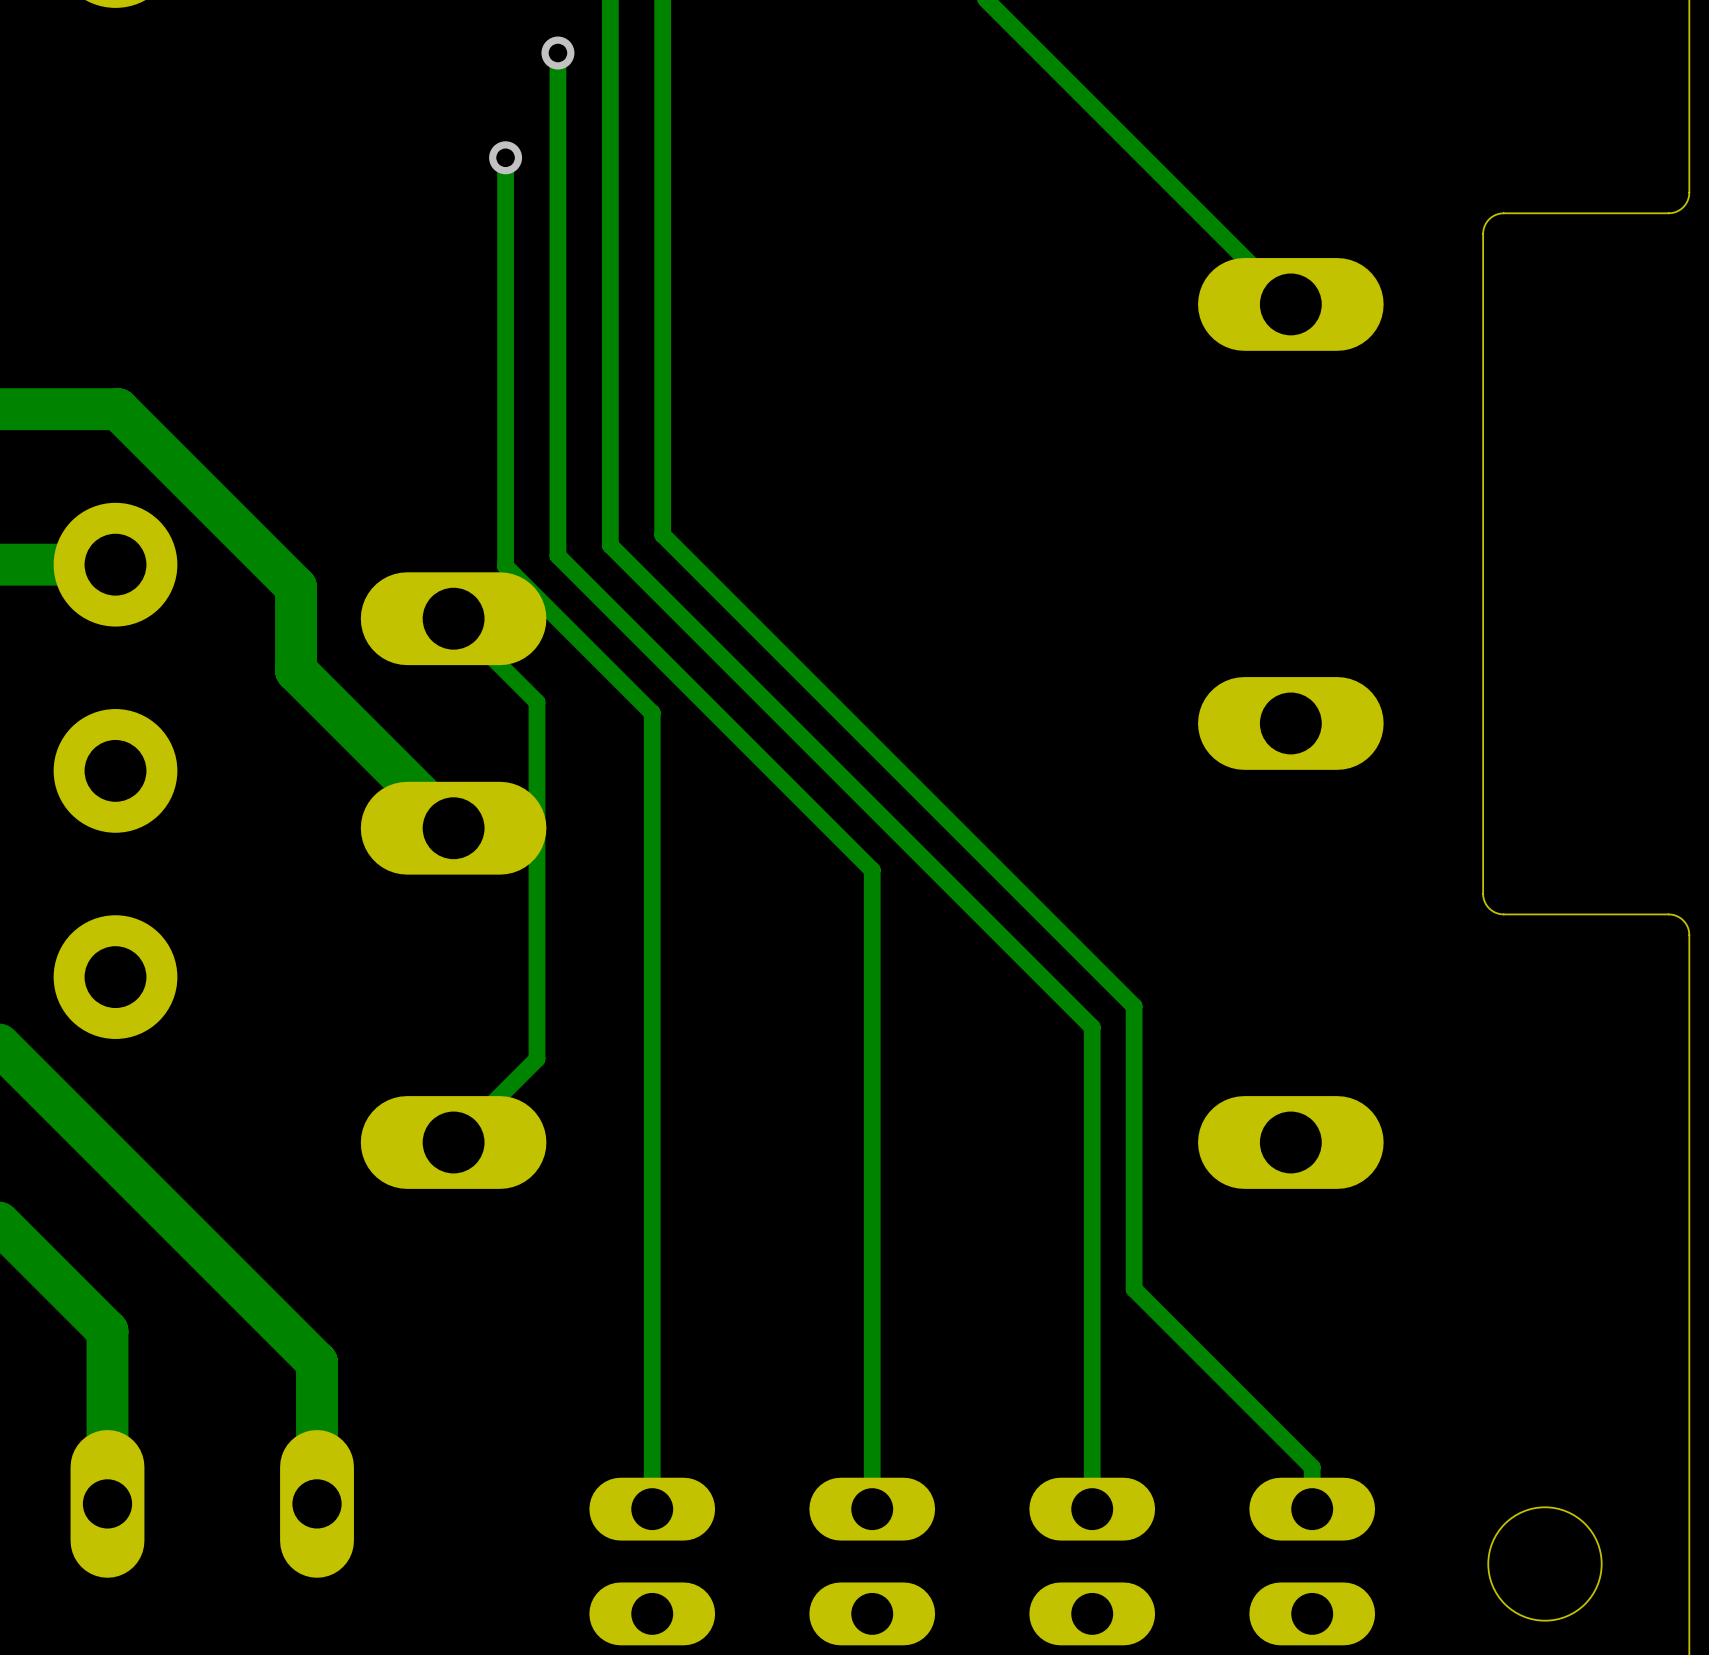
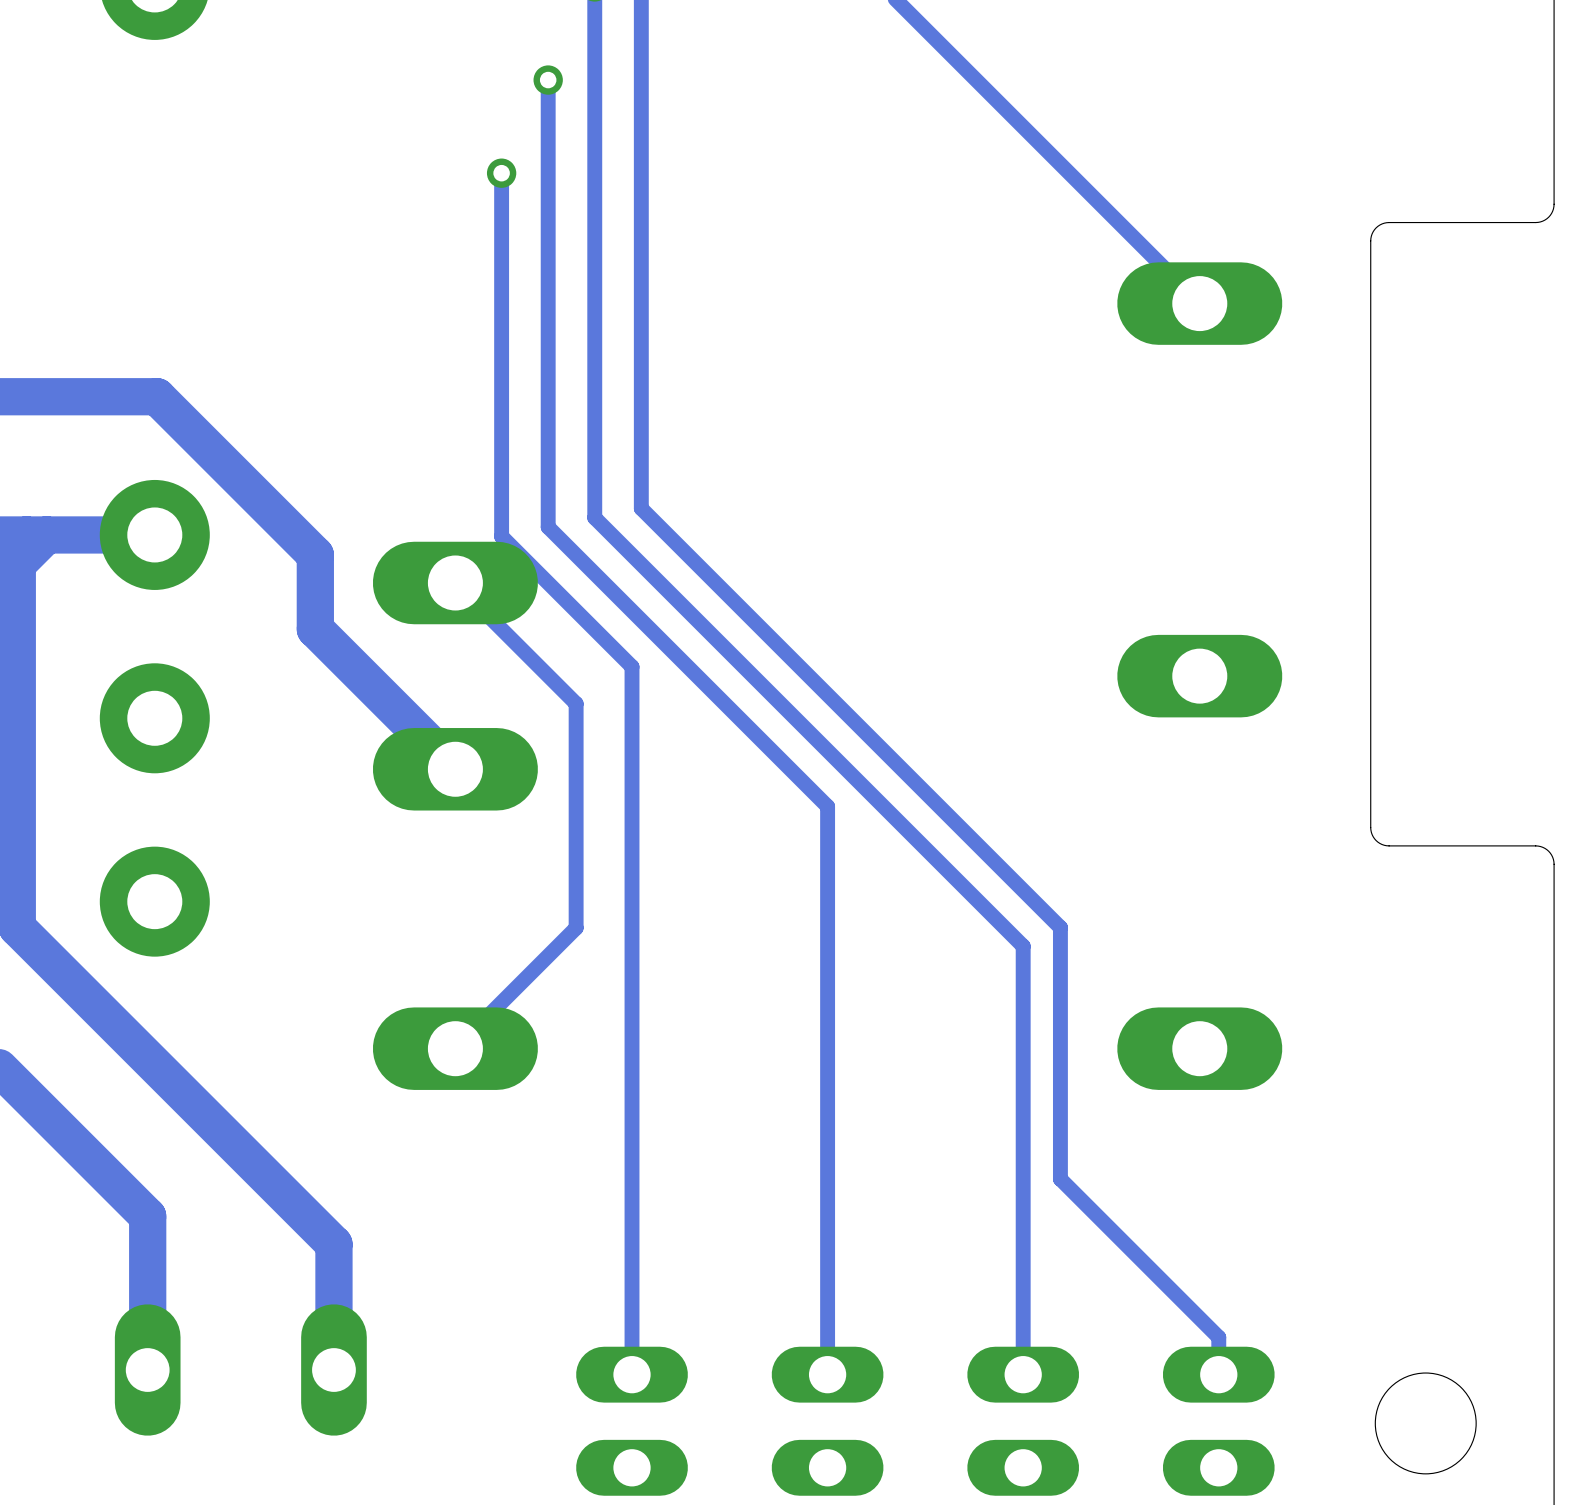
track: (537, 702) (537, 1059) -> (529, 657) (576, 703) (576, 927) (529, 974)

